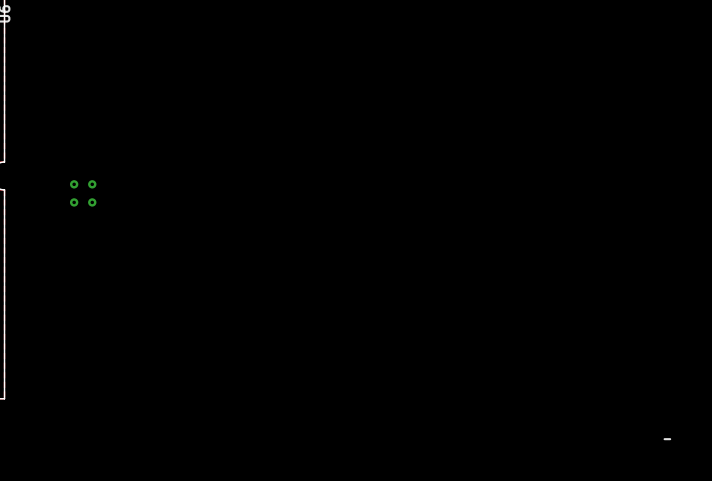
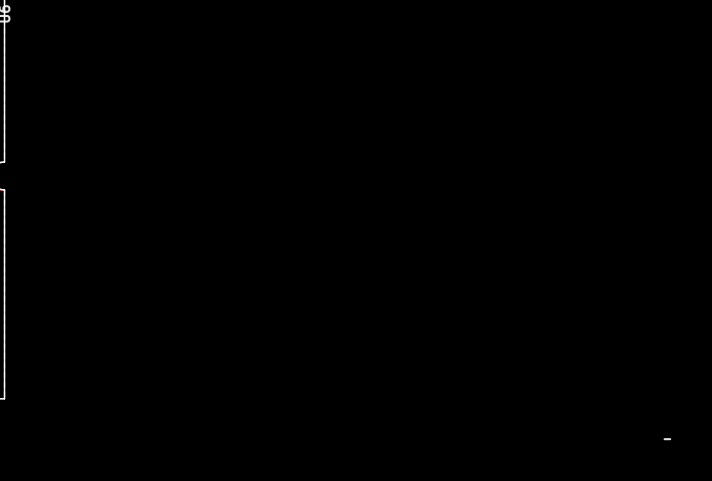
via: (74, 184) -> none
via: (92, 184) -> none
via: (74, 202) -> none
via: (92, 202) -> none

